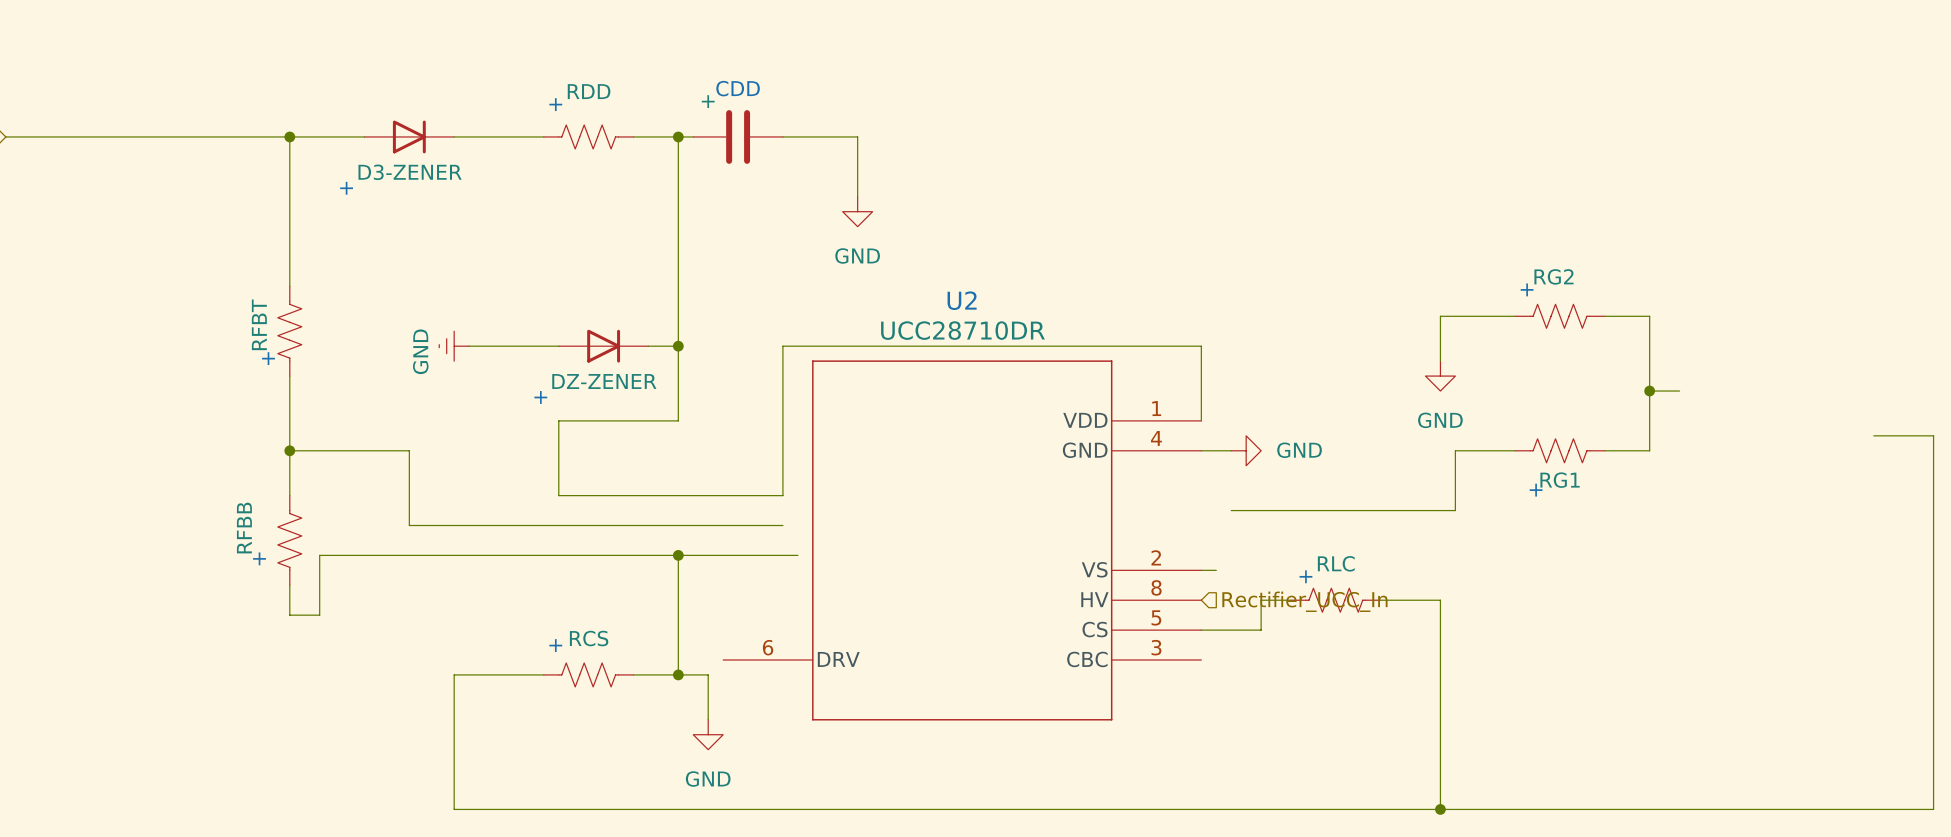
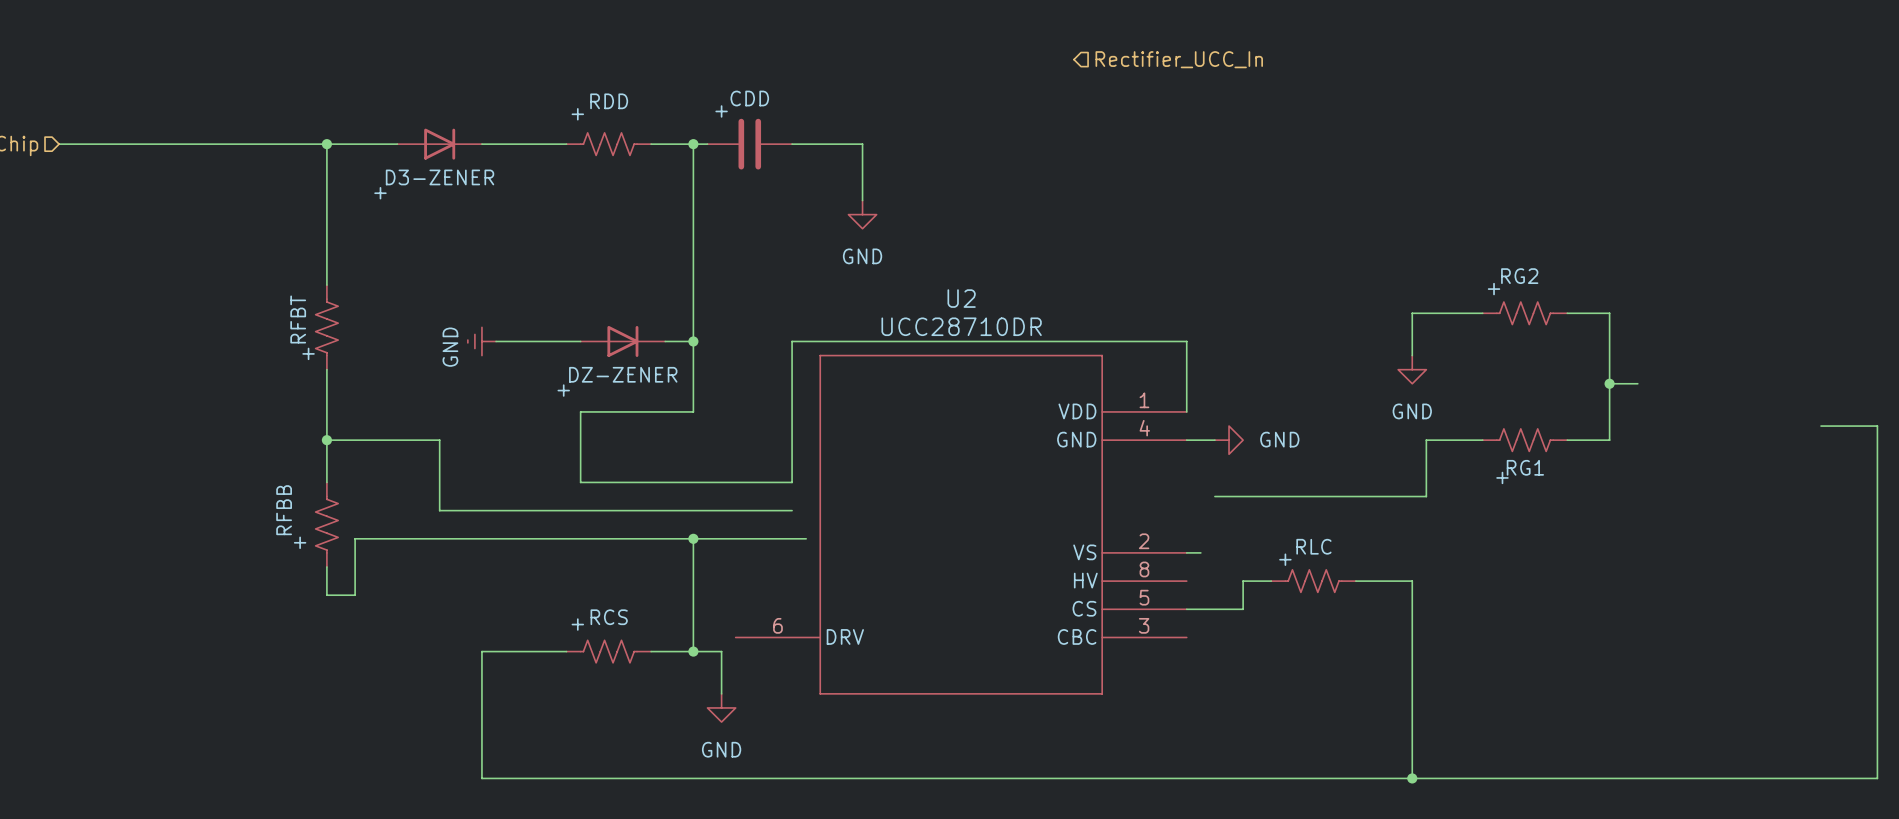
hierarchical label: none -> Rectifier_UCC_In (1179, 59)
hierarchical label: Rectifier_UCC_In (1304, 601) -> none

